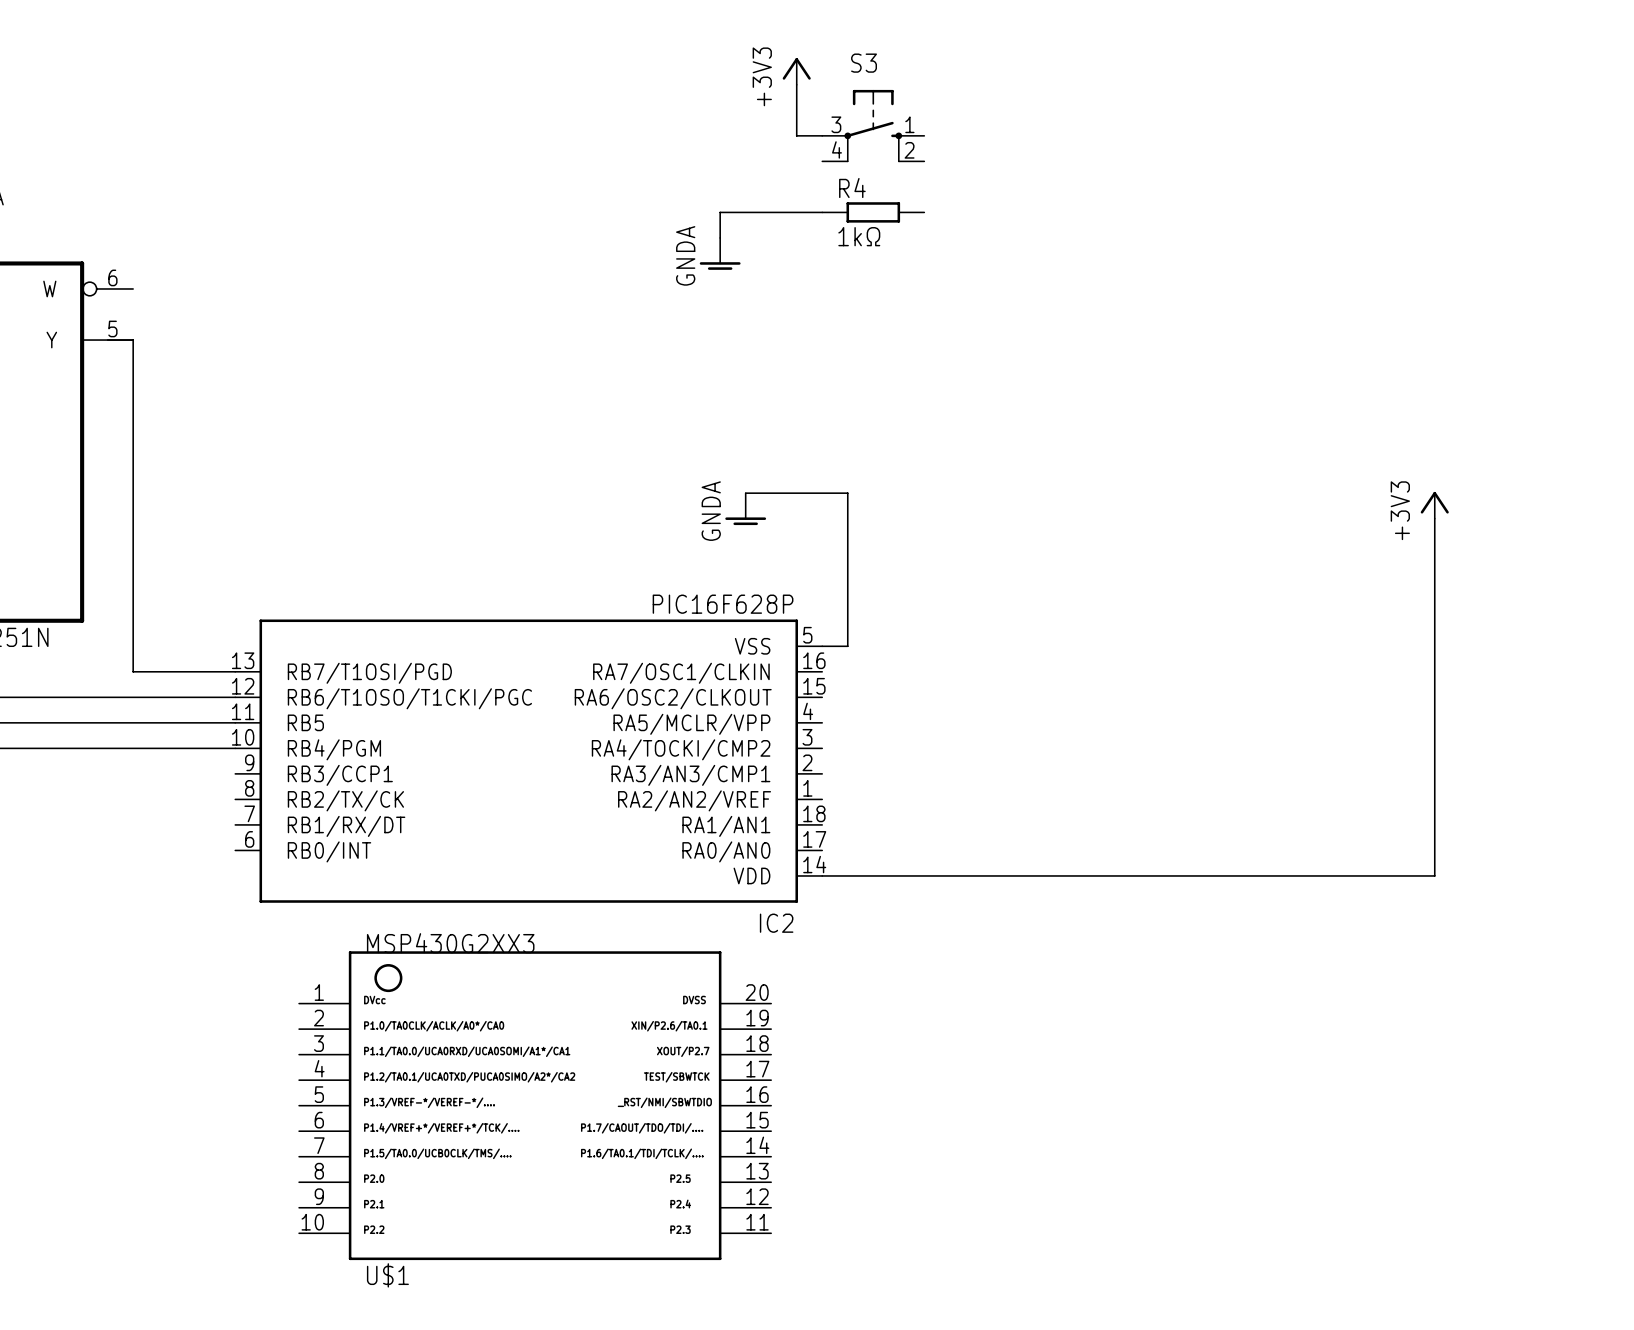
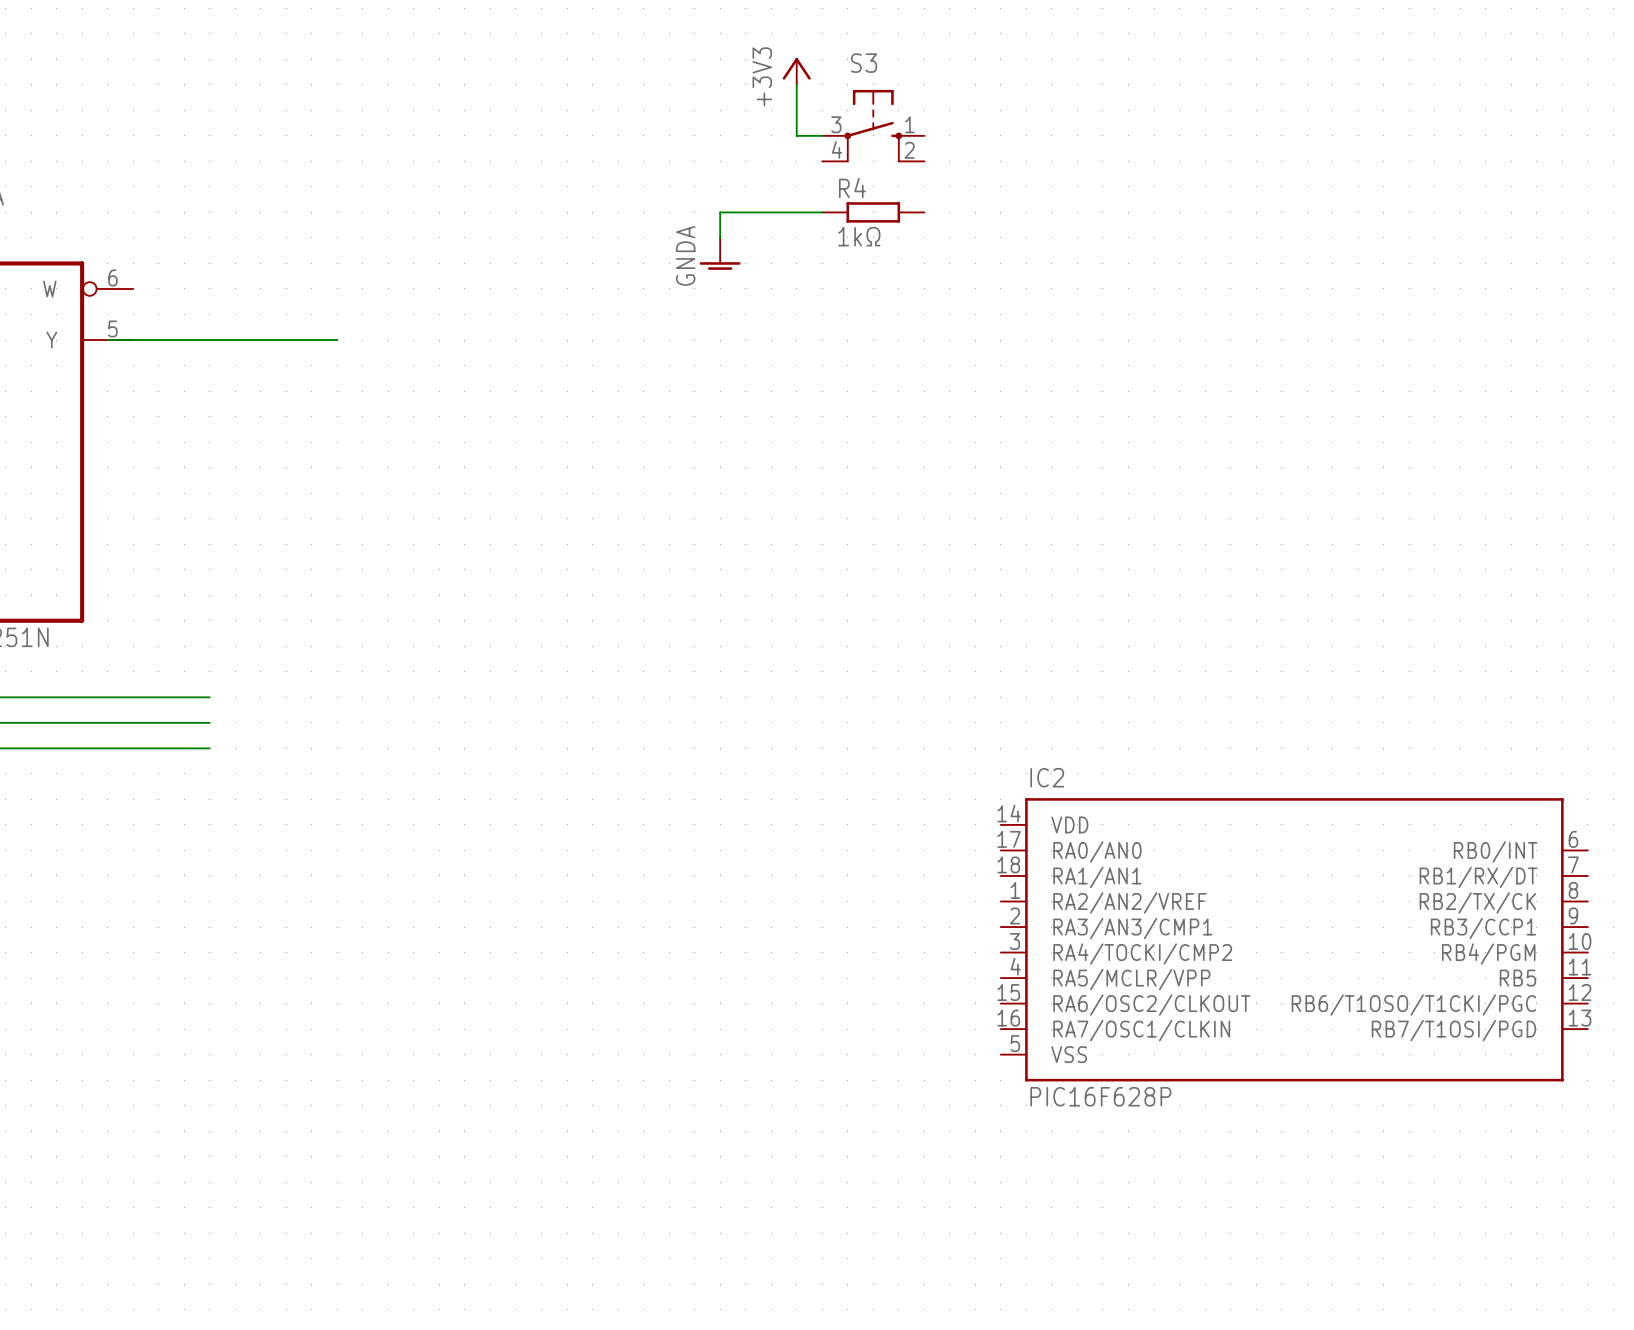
wire: (133, 340) (133, 671) (235, 671) -> (133, 340) (337, 340)
wire: (745, 493) (847, 493) (847, 646) (822, 646) -> none
power symbol: +3V3 (1434, 505) -> none
power symbol: GNDA (745, 509) -> none
wire: (1434, 518) (1434, 875) (822, 875) -> none
wire: (209, 697) (235, 697) -> none
wire: (209, 722) (235, 722) -> none
wire: (209, 748) (235, 748) -> none
IC2 rotation: 0° (528, 761) -> 180° (1294, 939)
IC2 position: (528, 761) -> (1294, 939)
U$1: (535, 1105) -> none

